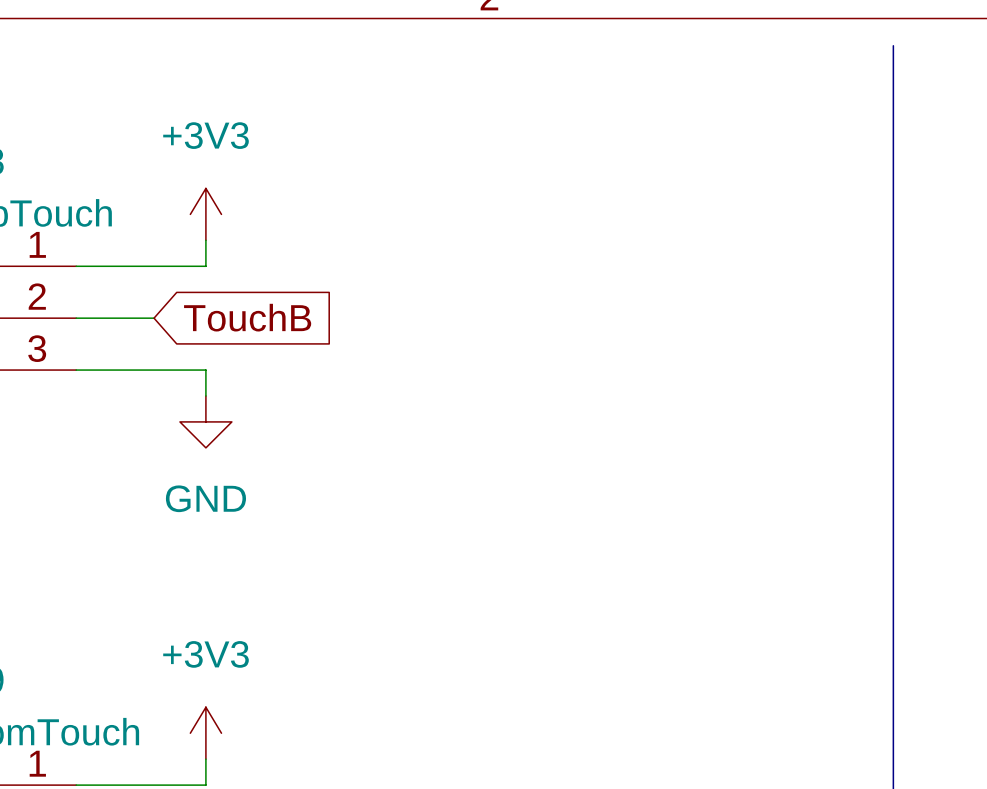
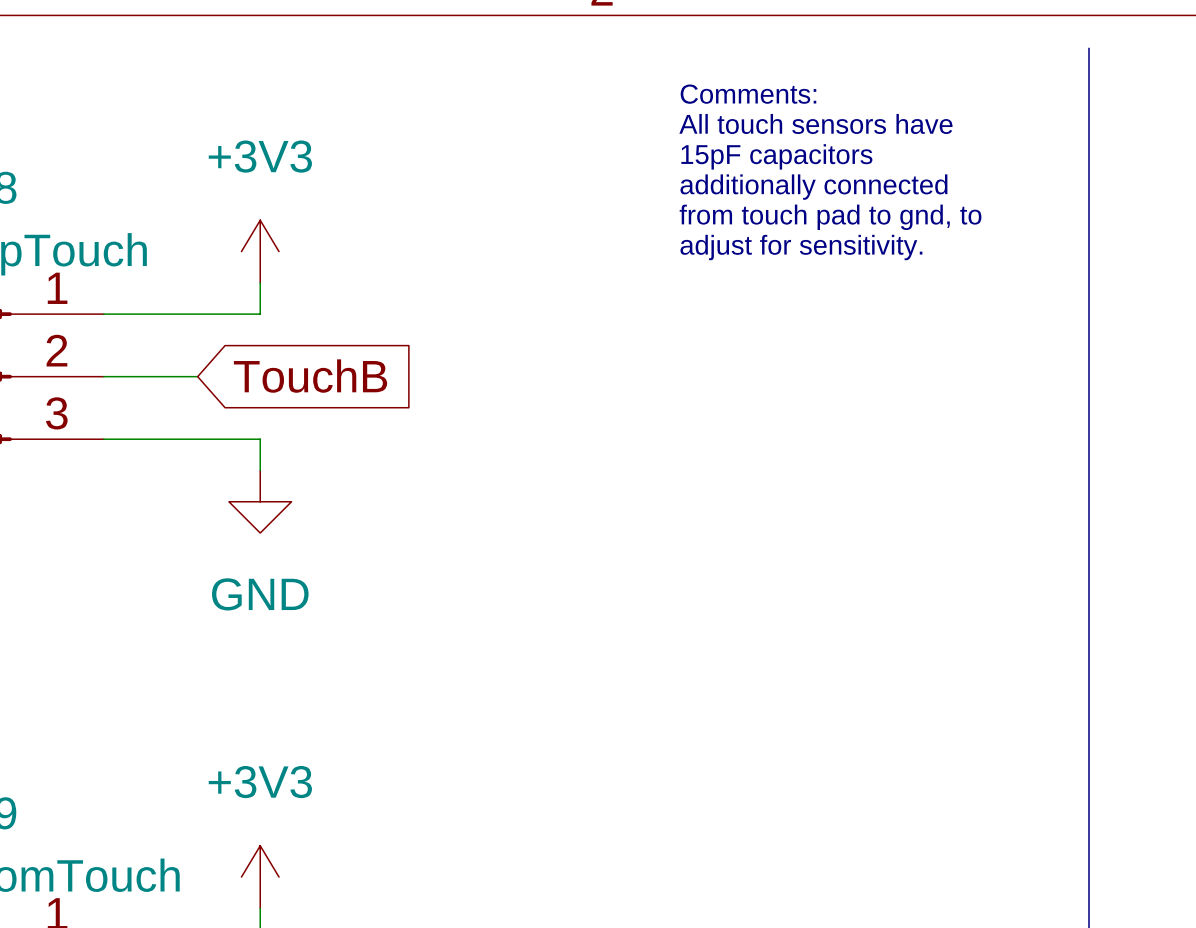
text: none -> Comments: (748, 94)
text: none -> All touch sensors have (815, 123)
text: none -> 15pF capacitors (776, 156)
text: none -> additionally connected (813, 187)
text: none -> from touch pad to gnd, to (830, 217)
text: none -> adjust for sensitivity. (801, 247)

